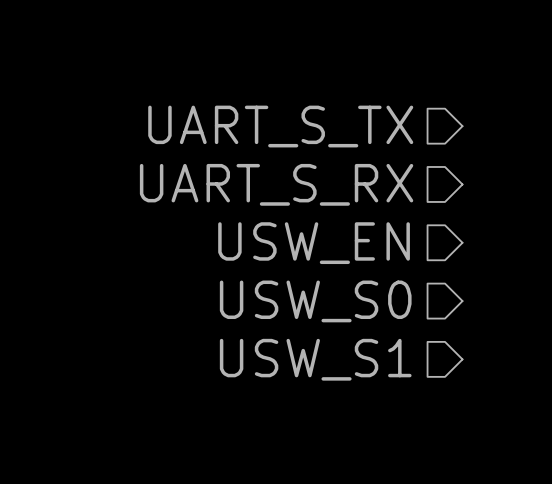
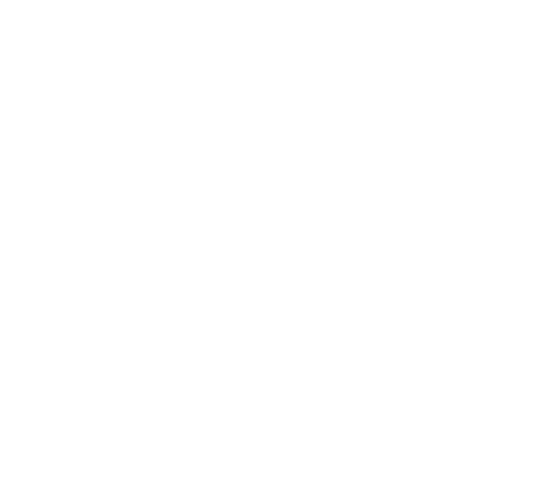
hierarchical label: UART_S_TX (280, 126) -> none
hierarchical label: UART_S_RX (276, 184) -> none
hierarchical label: USW_EN (314, 243) -> none
hierarchical label: USW_S0 (315, 301) -> none
hierarchical label: USW_S1 (315, 359) -> none

